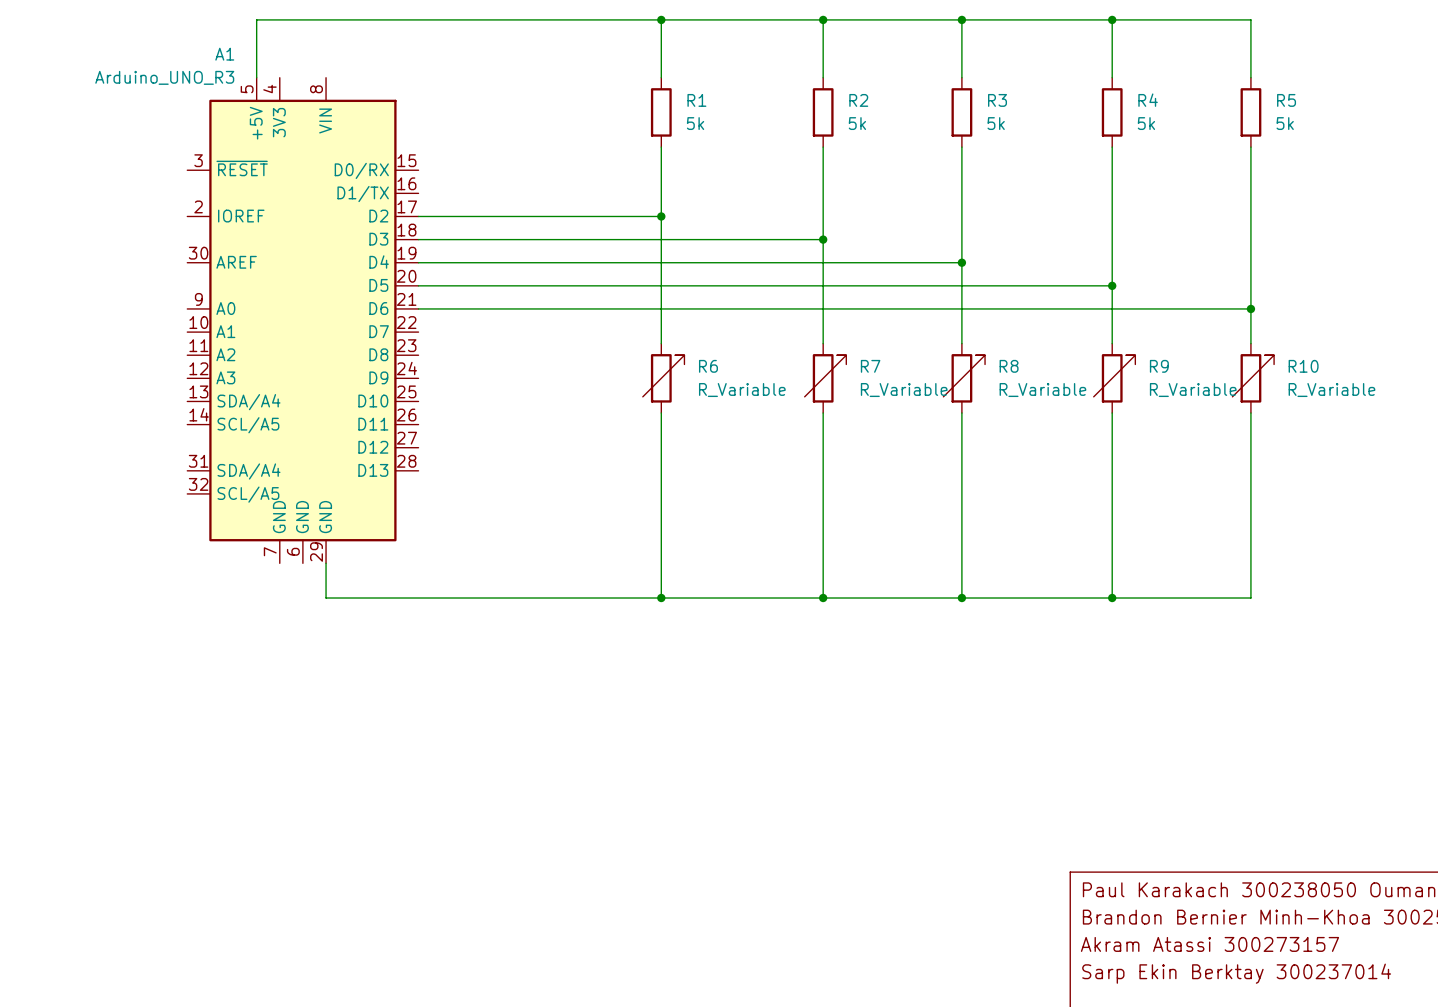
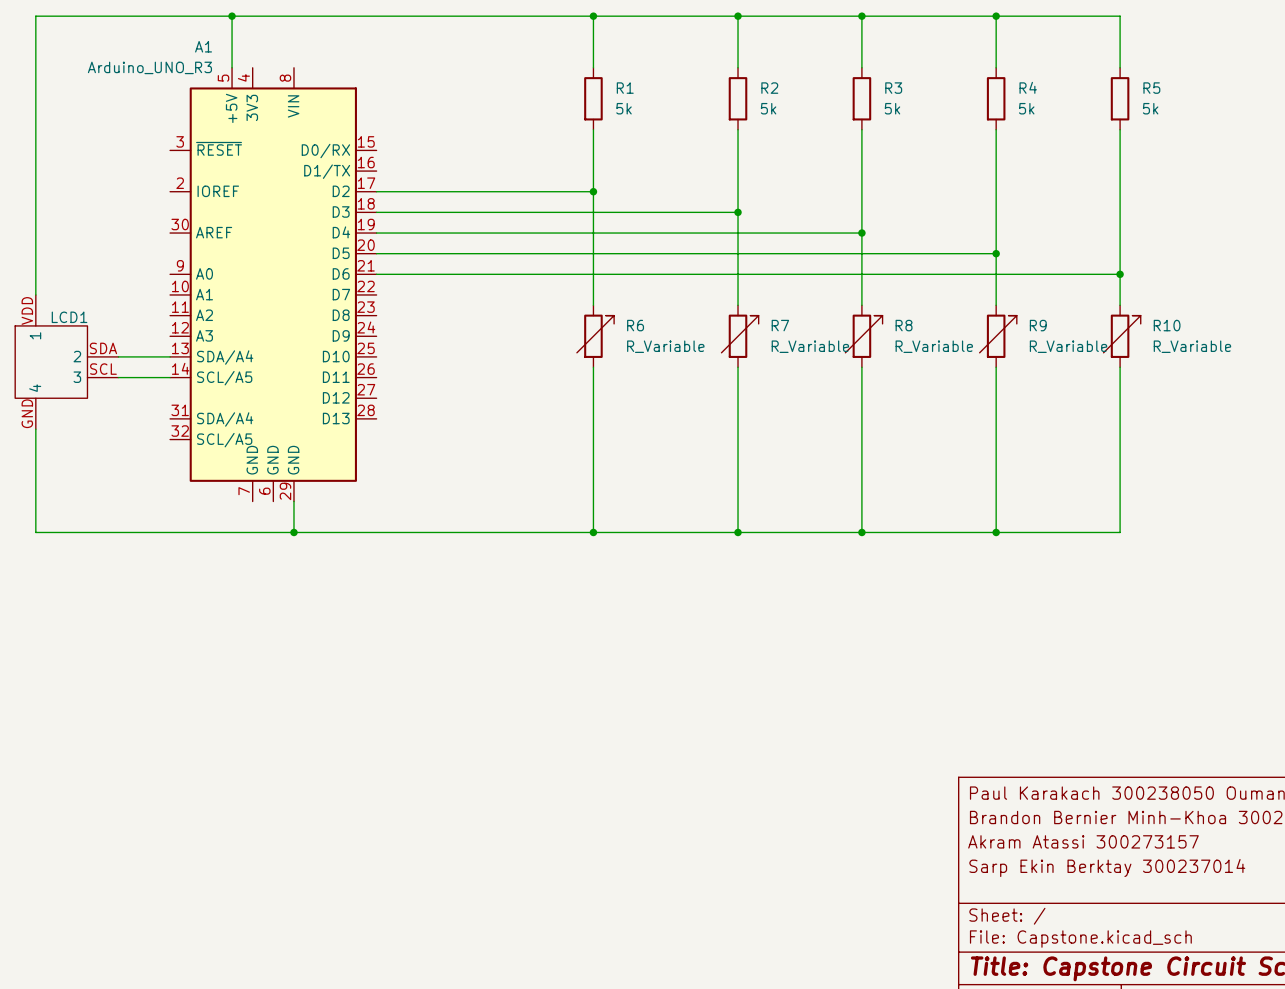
wire: none -> (232, 16) (35, 16) (35, 294)
junction: none -> (232, 16)
wire: none -> (118, 356) (170, 356)
LCD1: none -> (66, 362)
wire: none -> (118, 377) (170, 377)
wire: none -> (35, 429) (35, 532) (293, 532)
junction: none -> (293, 532)

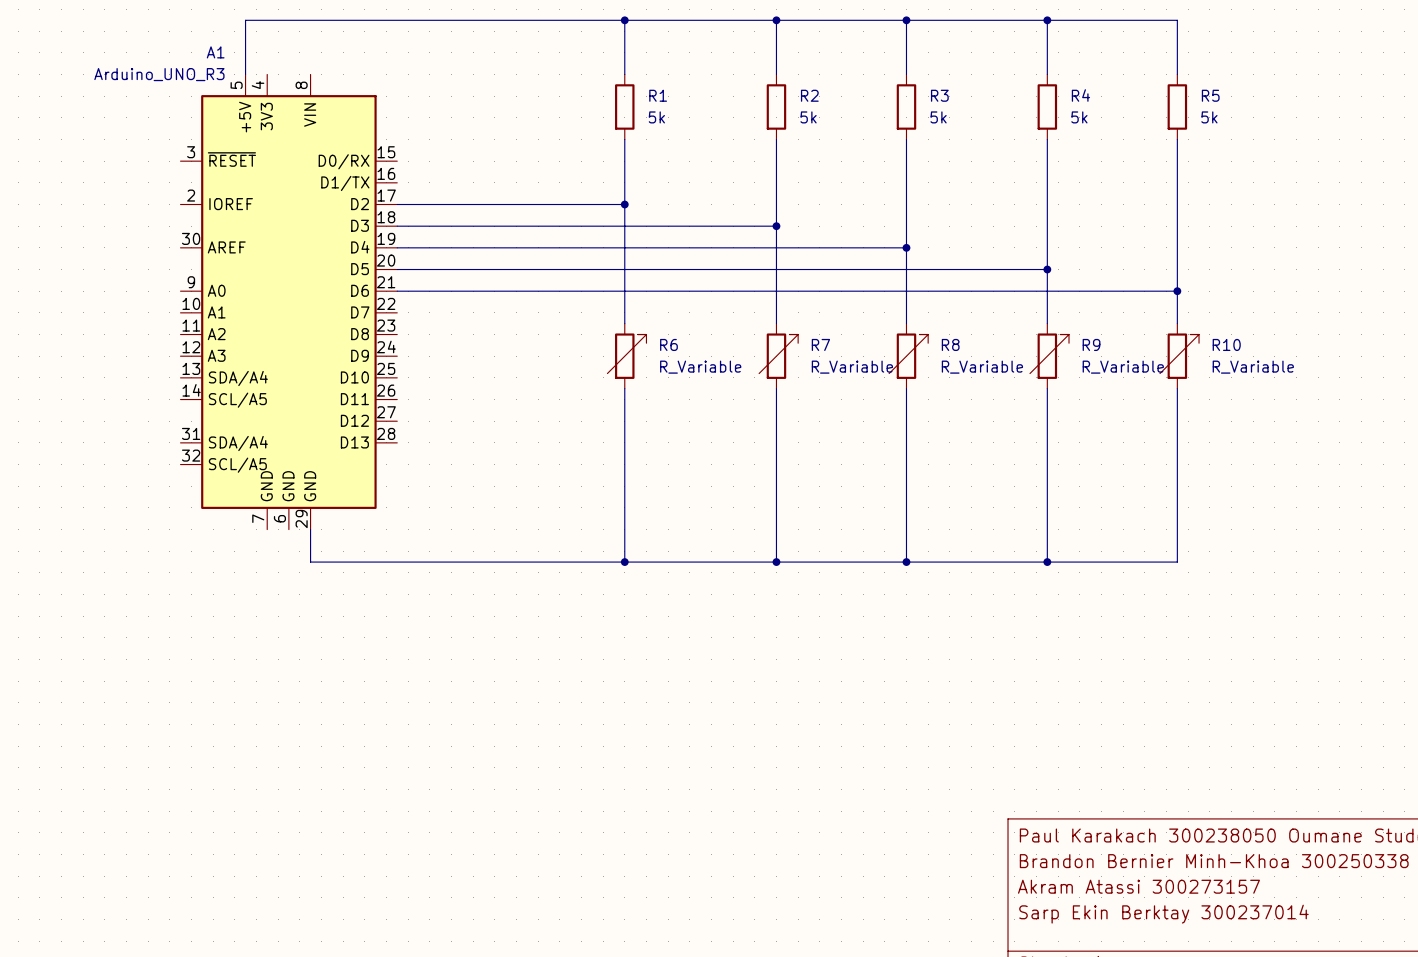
wire: (232, 16) (35, 16) (35, 294) -> none
junction: (232, 16) -> none
wire: (118, 356) (170, 356) -> none
LCD1: (66, 362) -> none
wire: (118, 377) (170, 377) -> none
wire: (35, 429) (35, 532) (293, 532) -> none
junction: (293, 532) -> none

